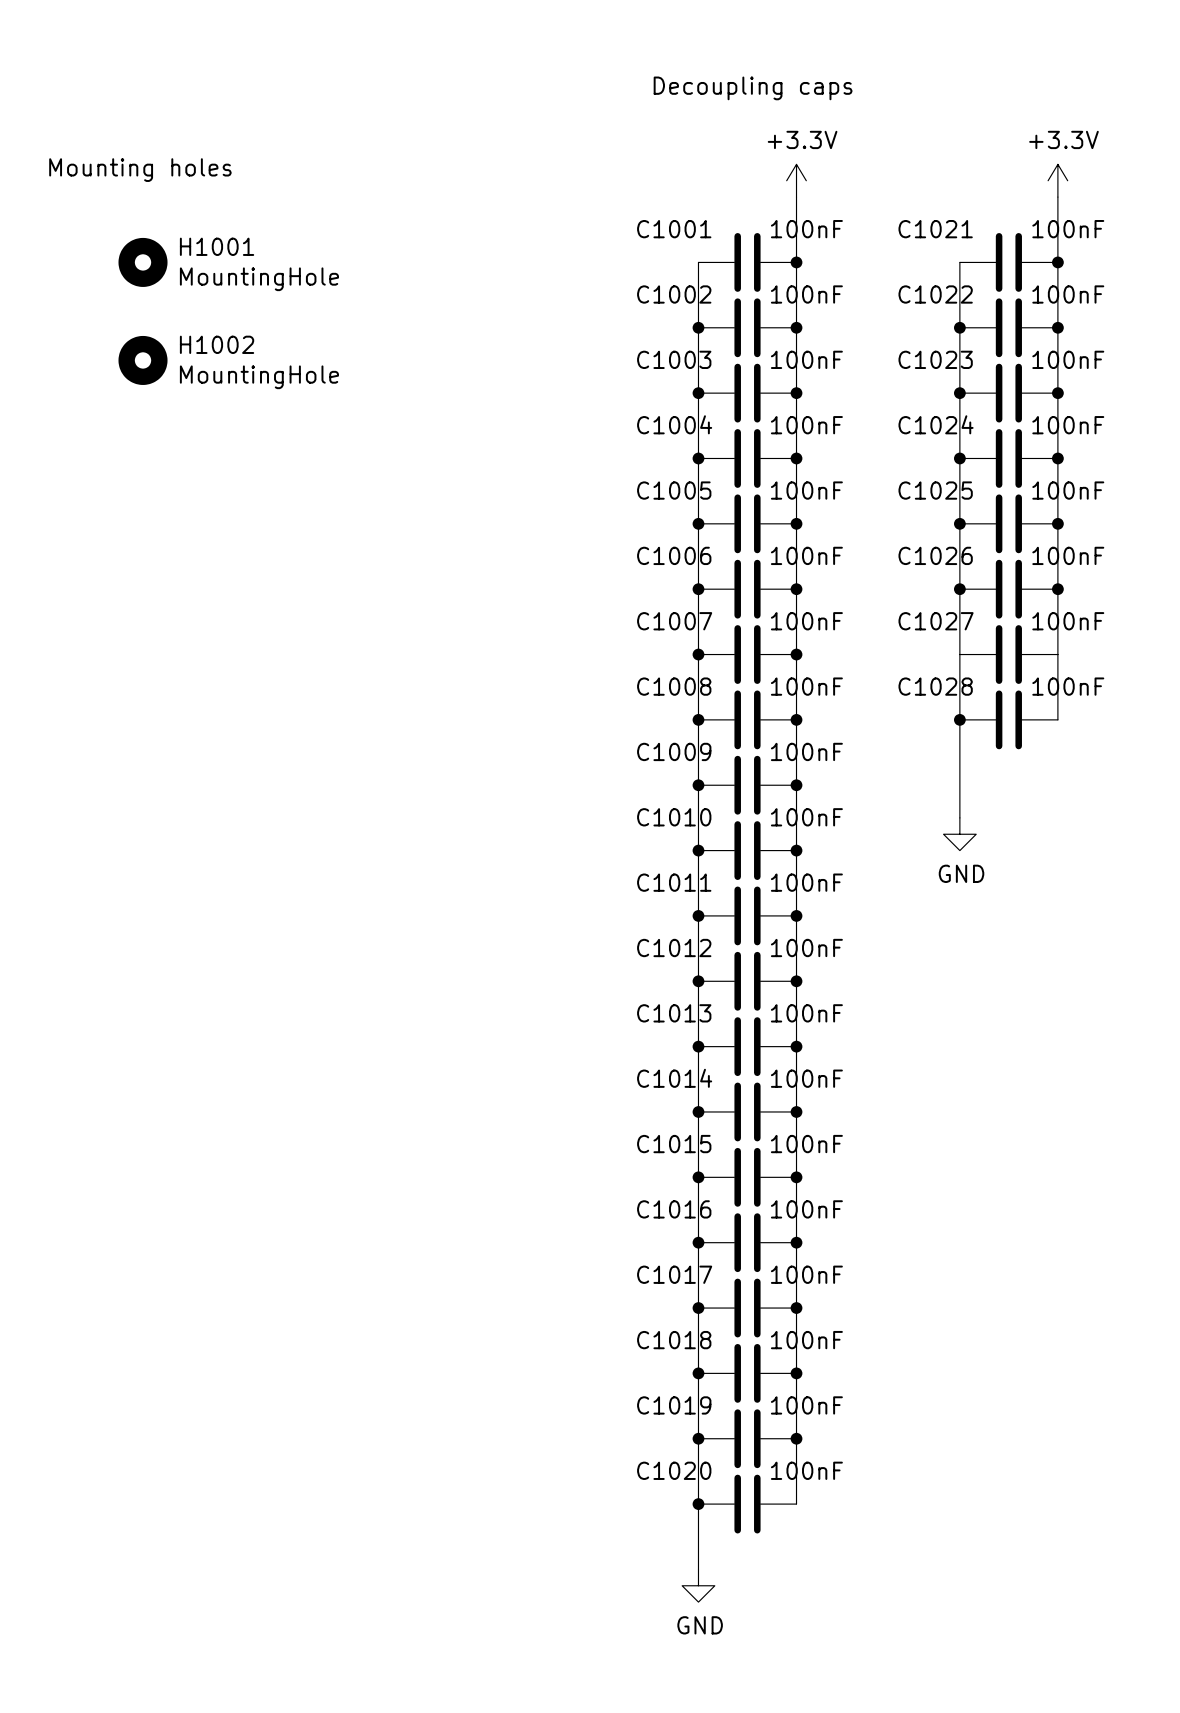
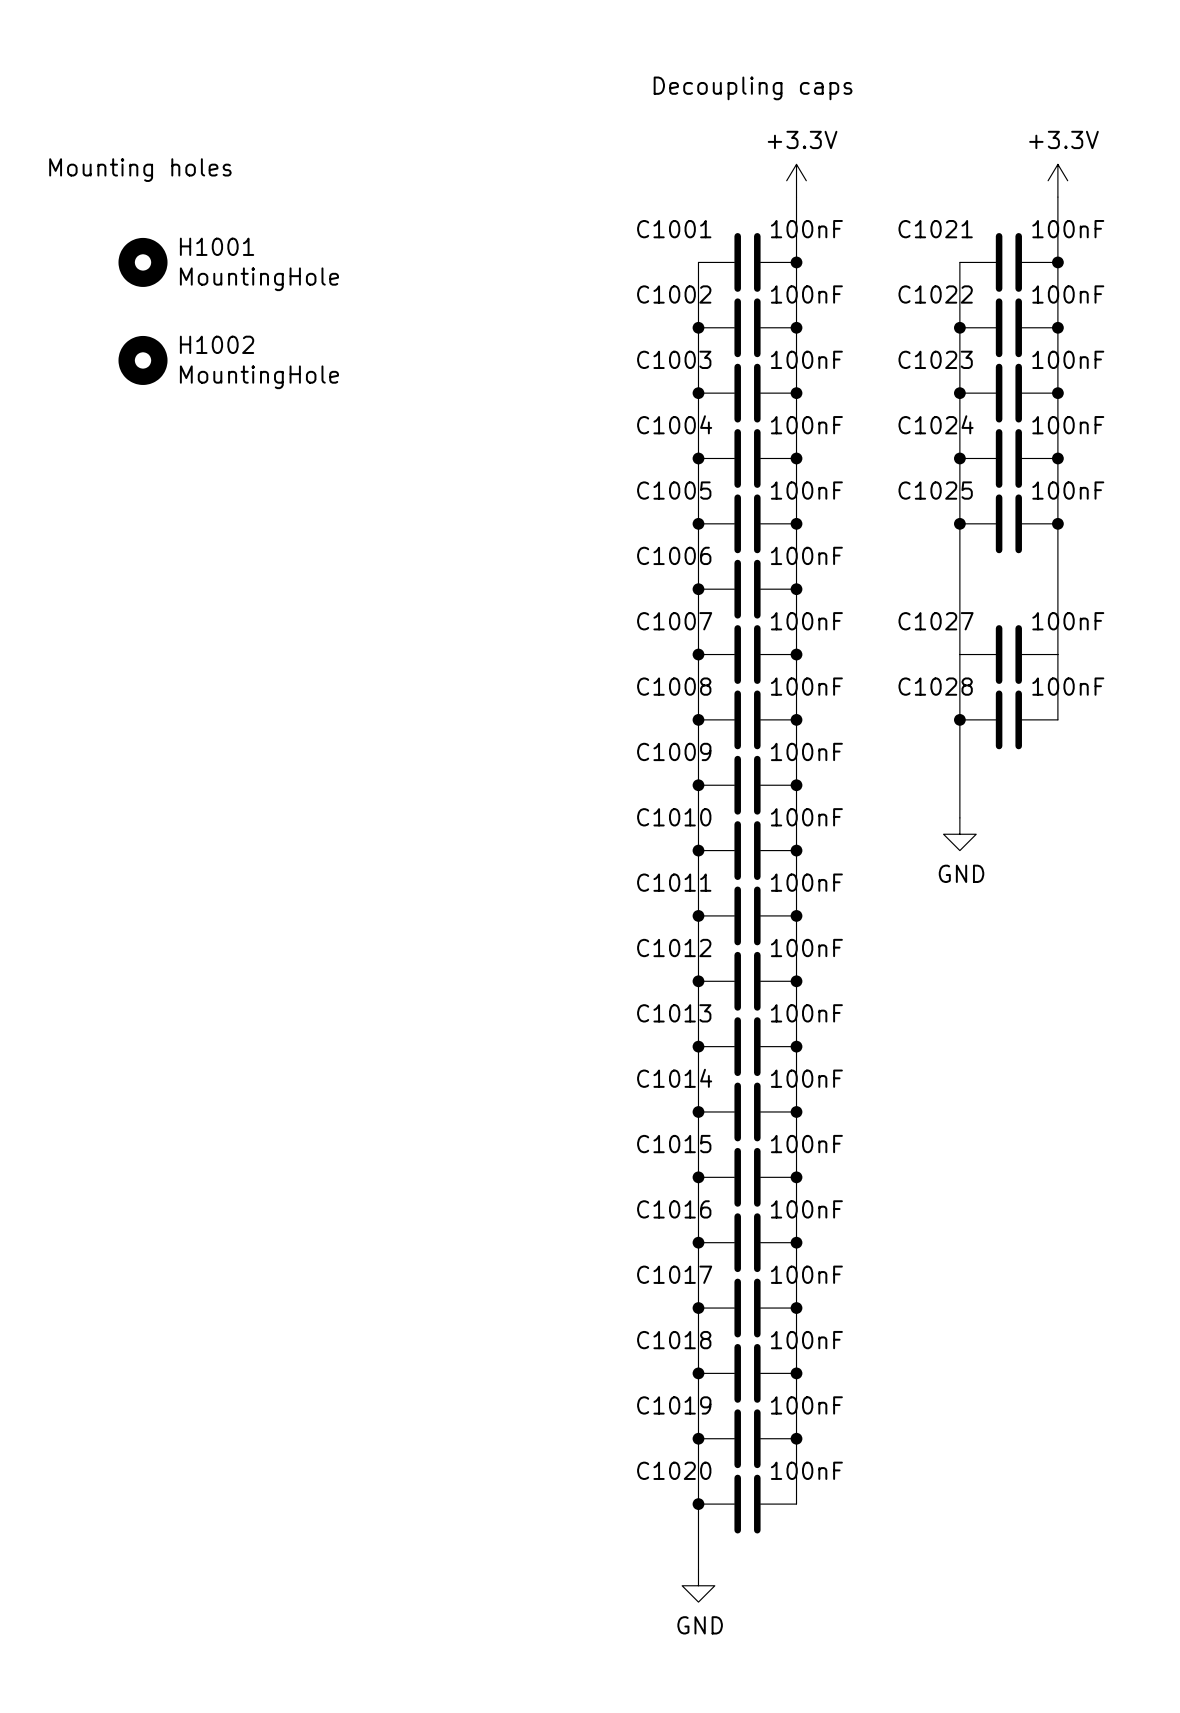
junction: (959, 589) -> none
C1026: 100nF (1008, 589) -> none
junction: (1057, 589) -> none

